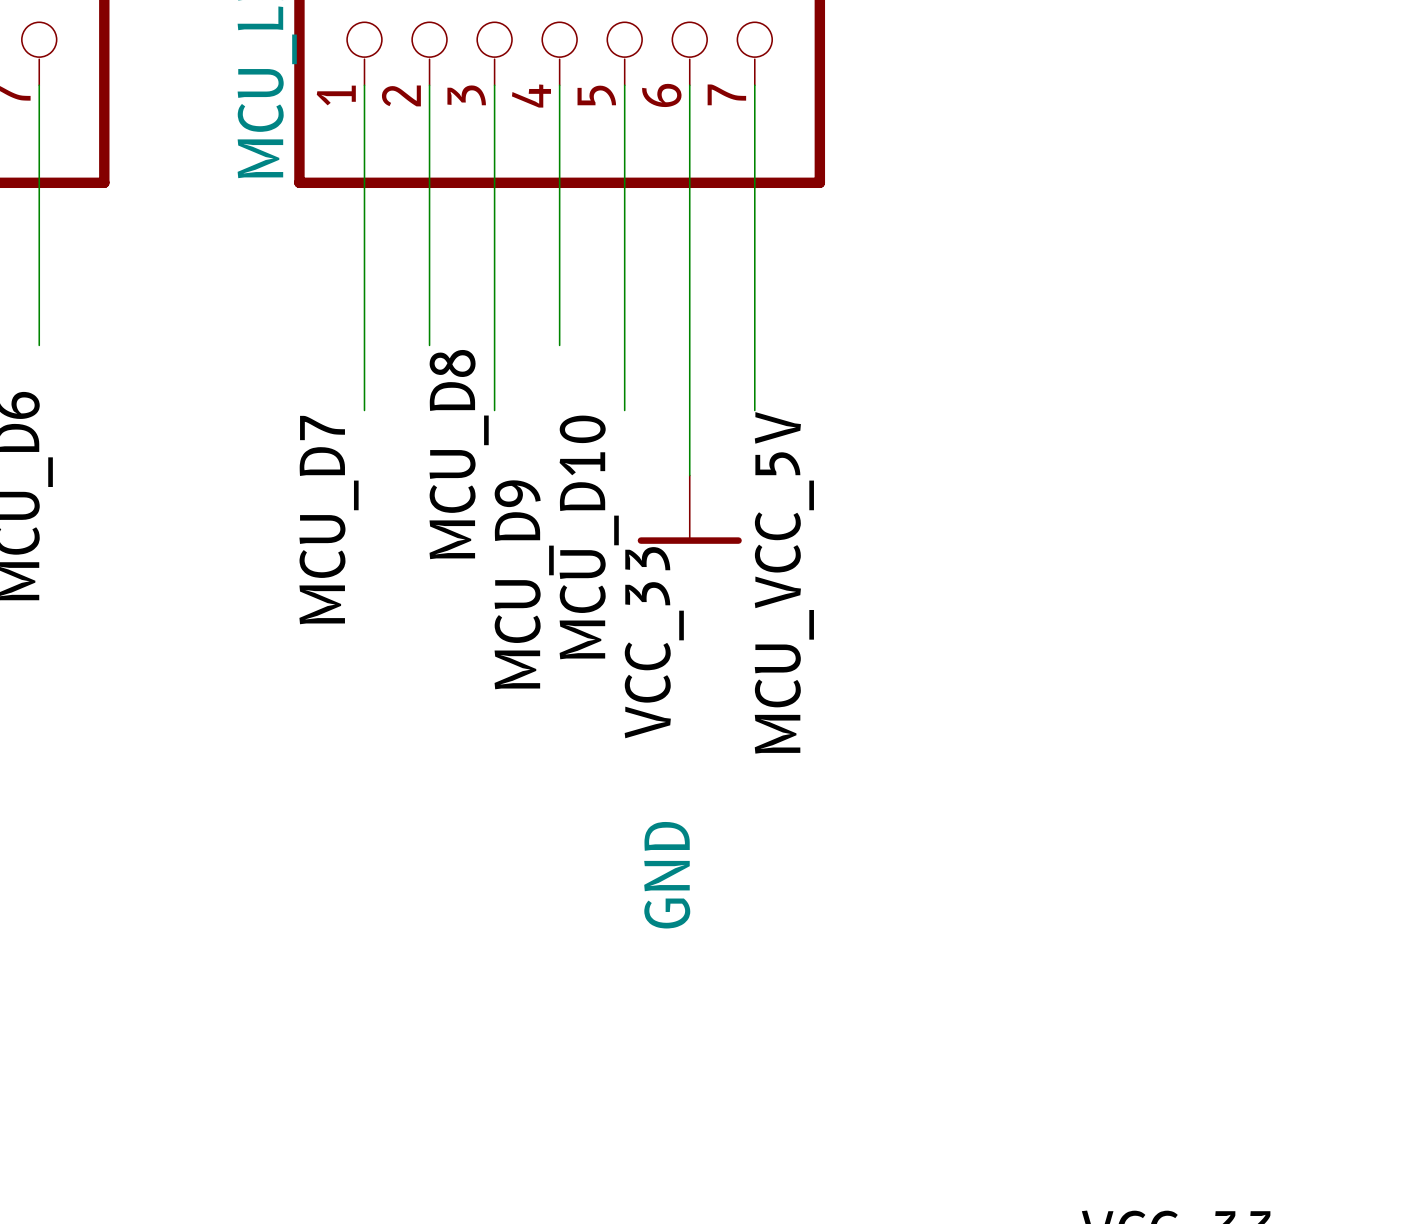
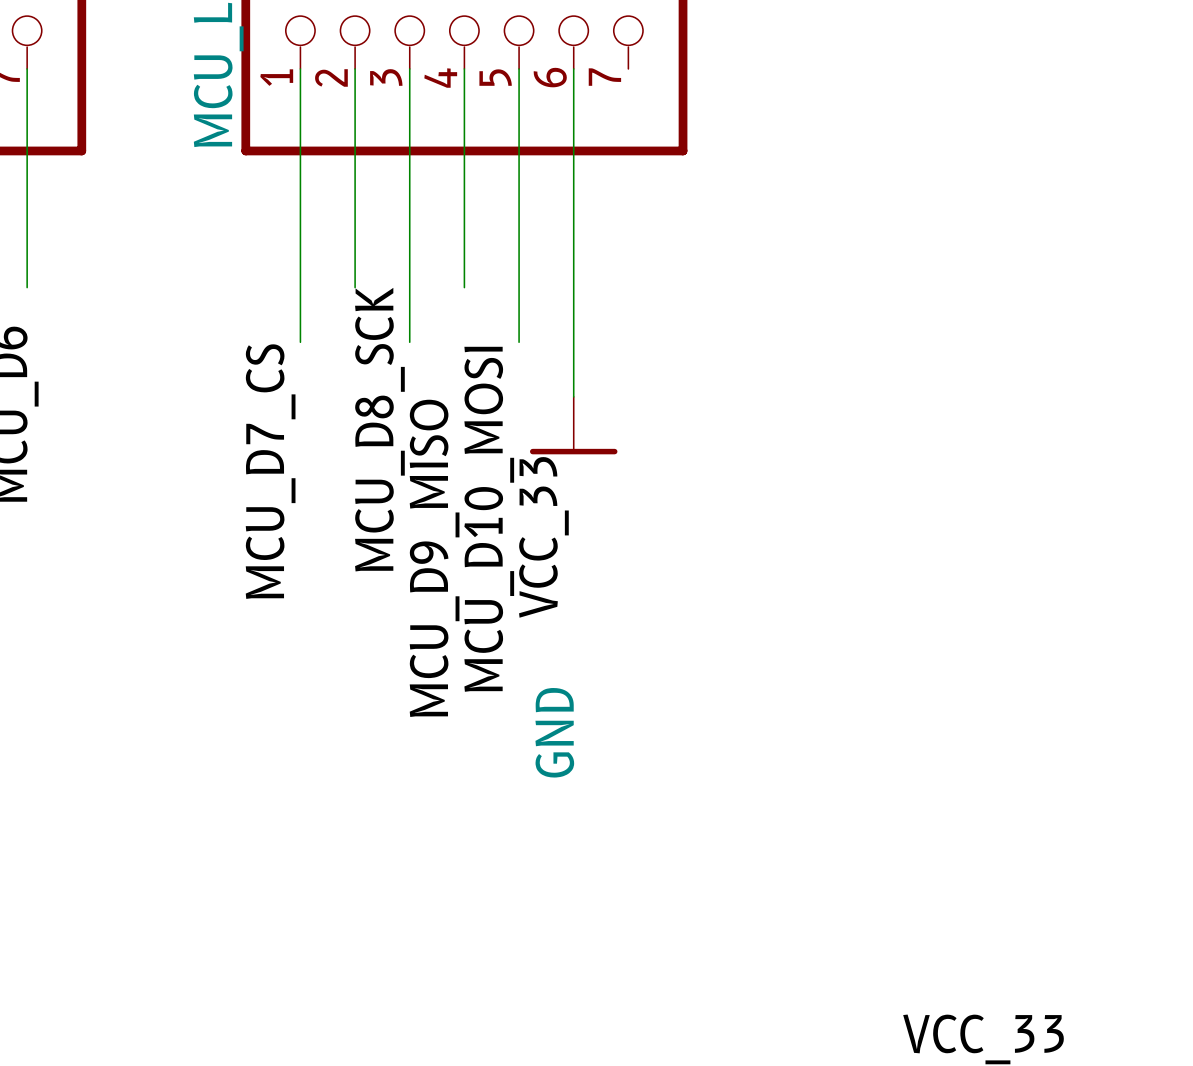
wire: (754, 85) (754, 410) -> none
label: MCU_D8 (459, 454) -> MCU_D8_SCK (379, 429)
label: MCU_D7 (329, 520) -> MCU_D7_CS (270, 471)
label: MCU_D10 (589, 537) -> MCU_D10_MOSI (489, 519)
label: MCU_VCC_5V (784, 582) -> none
label: MCU_D9 (524, 584) -> MCU_D9_MISO (434, 558)

